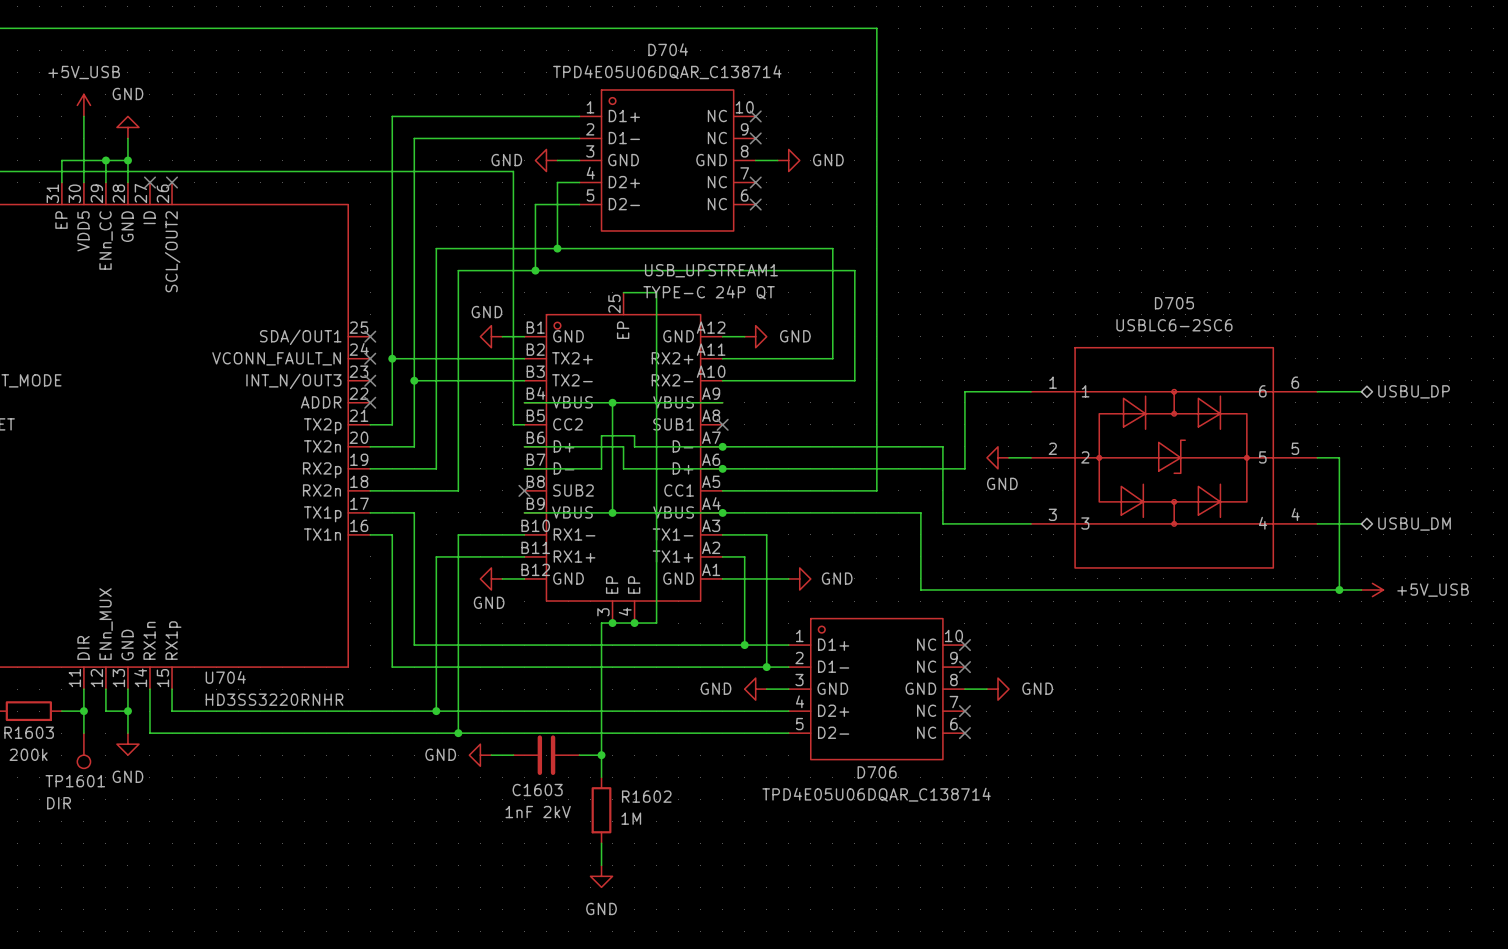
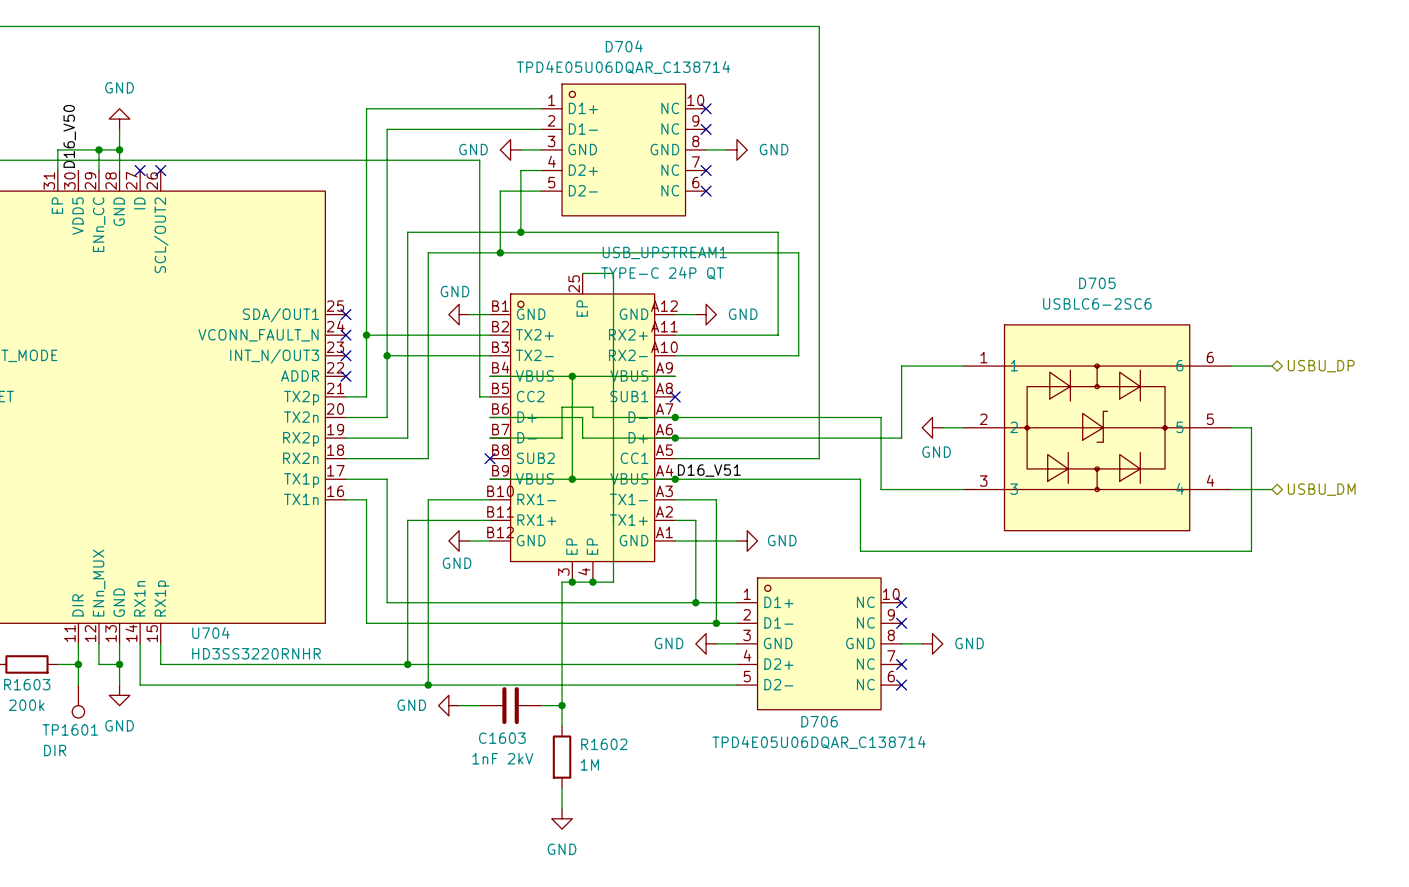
power symbol: +5V_USB (83, 105) -> none
wire: (83, 116) (83, 182) -> none
label: none -> D16_V50 (69, 136)
label: none -> D16_V51 (709, 470)
wire: (1339, 589) (1361, 589) -> none
junction: (1339, 589) -> none
power symbol: +5V_USB (1372, 589) -> none

